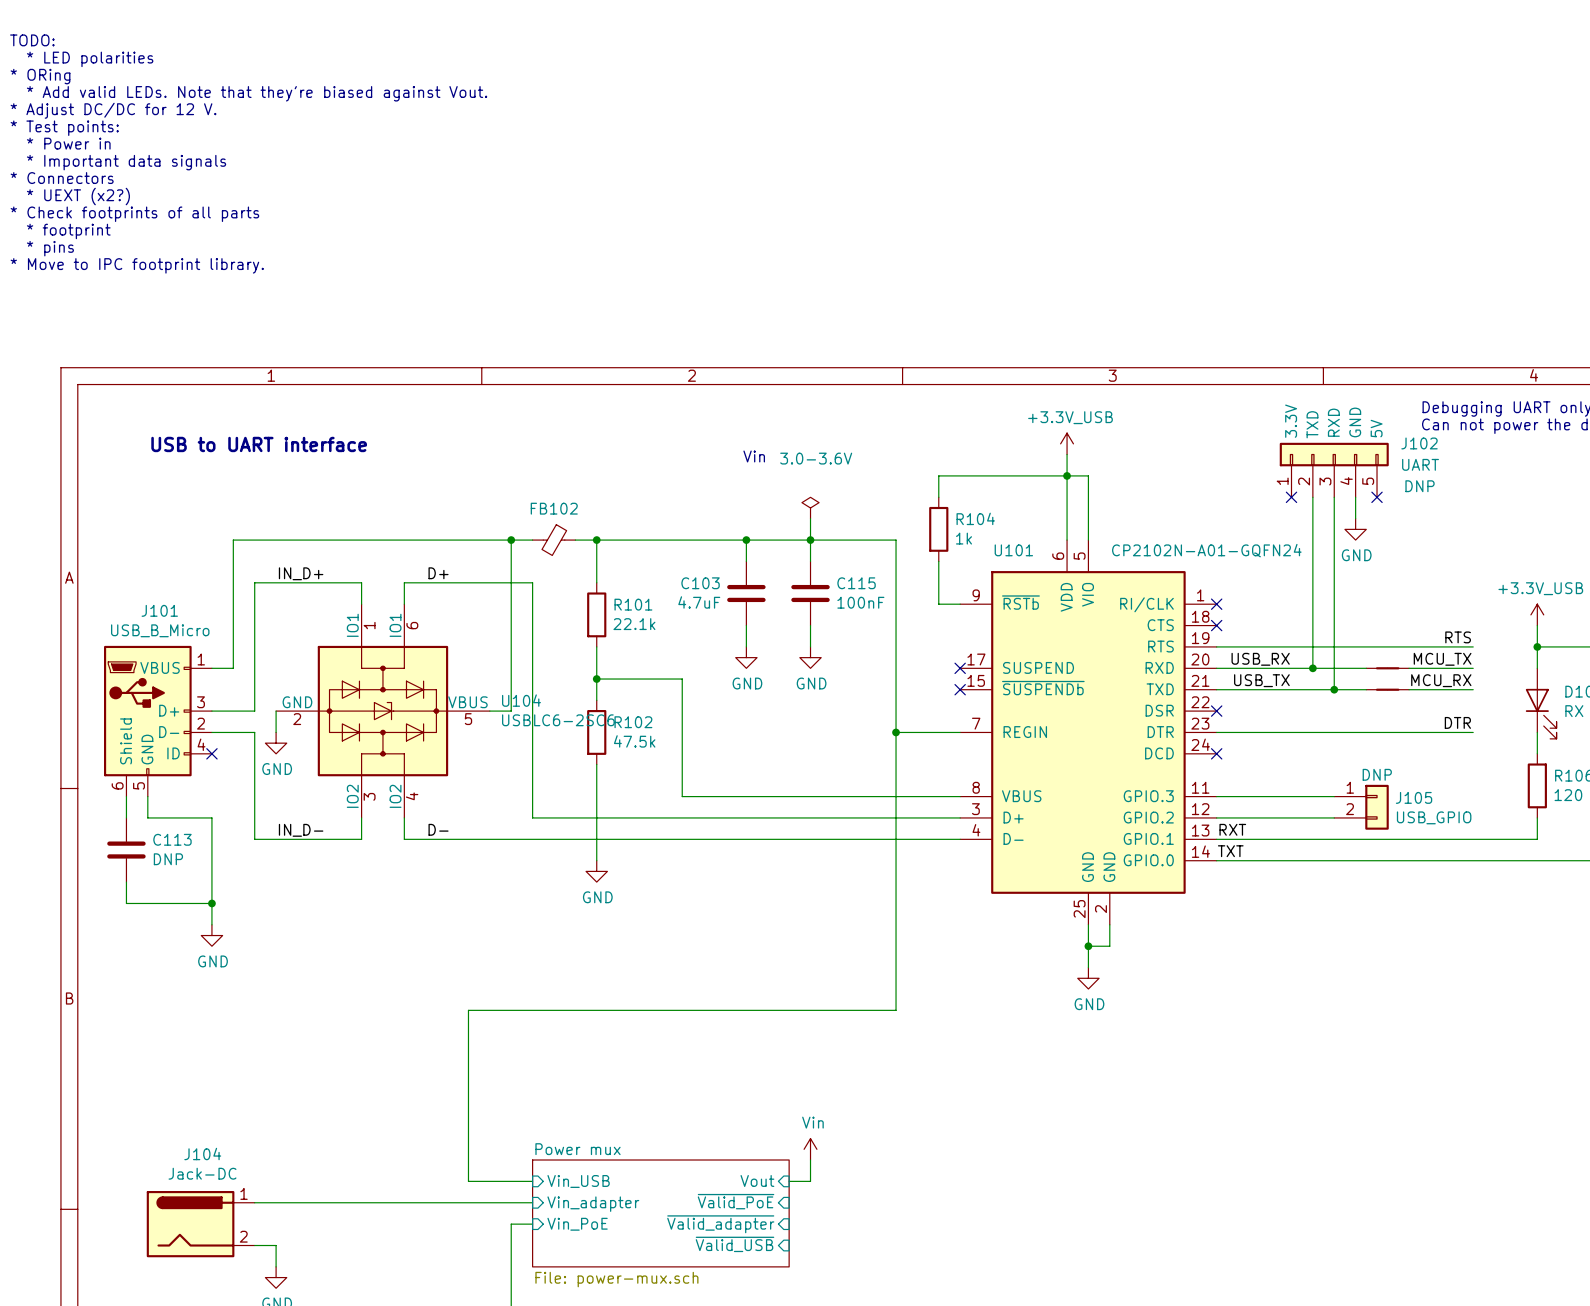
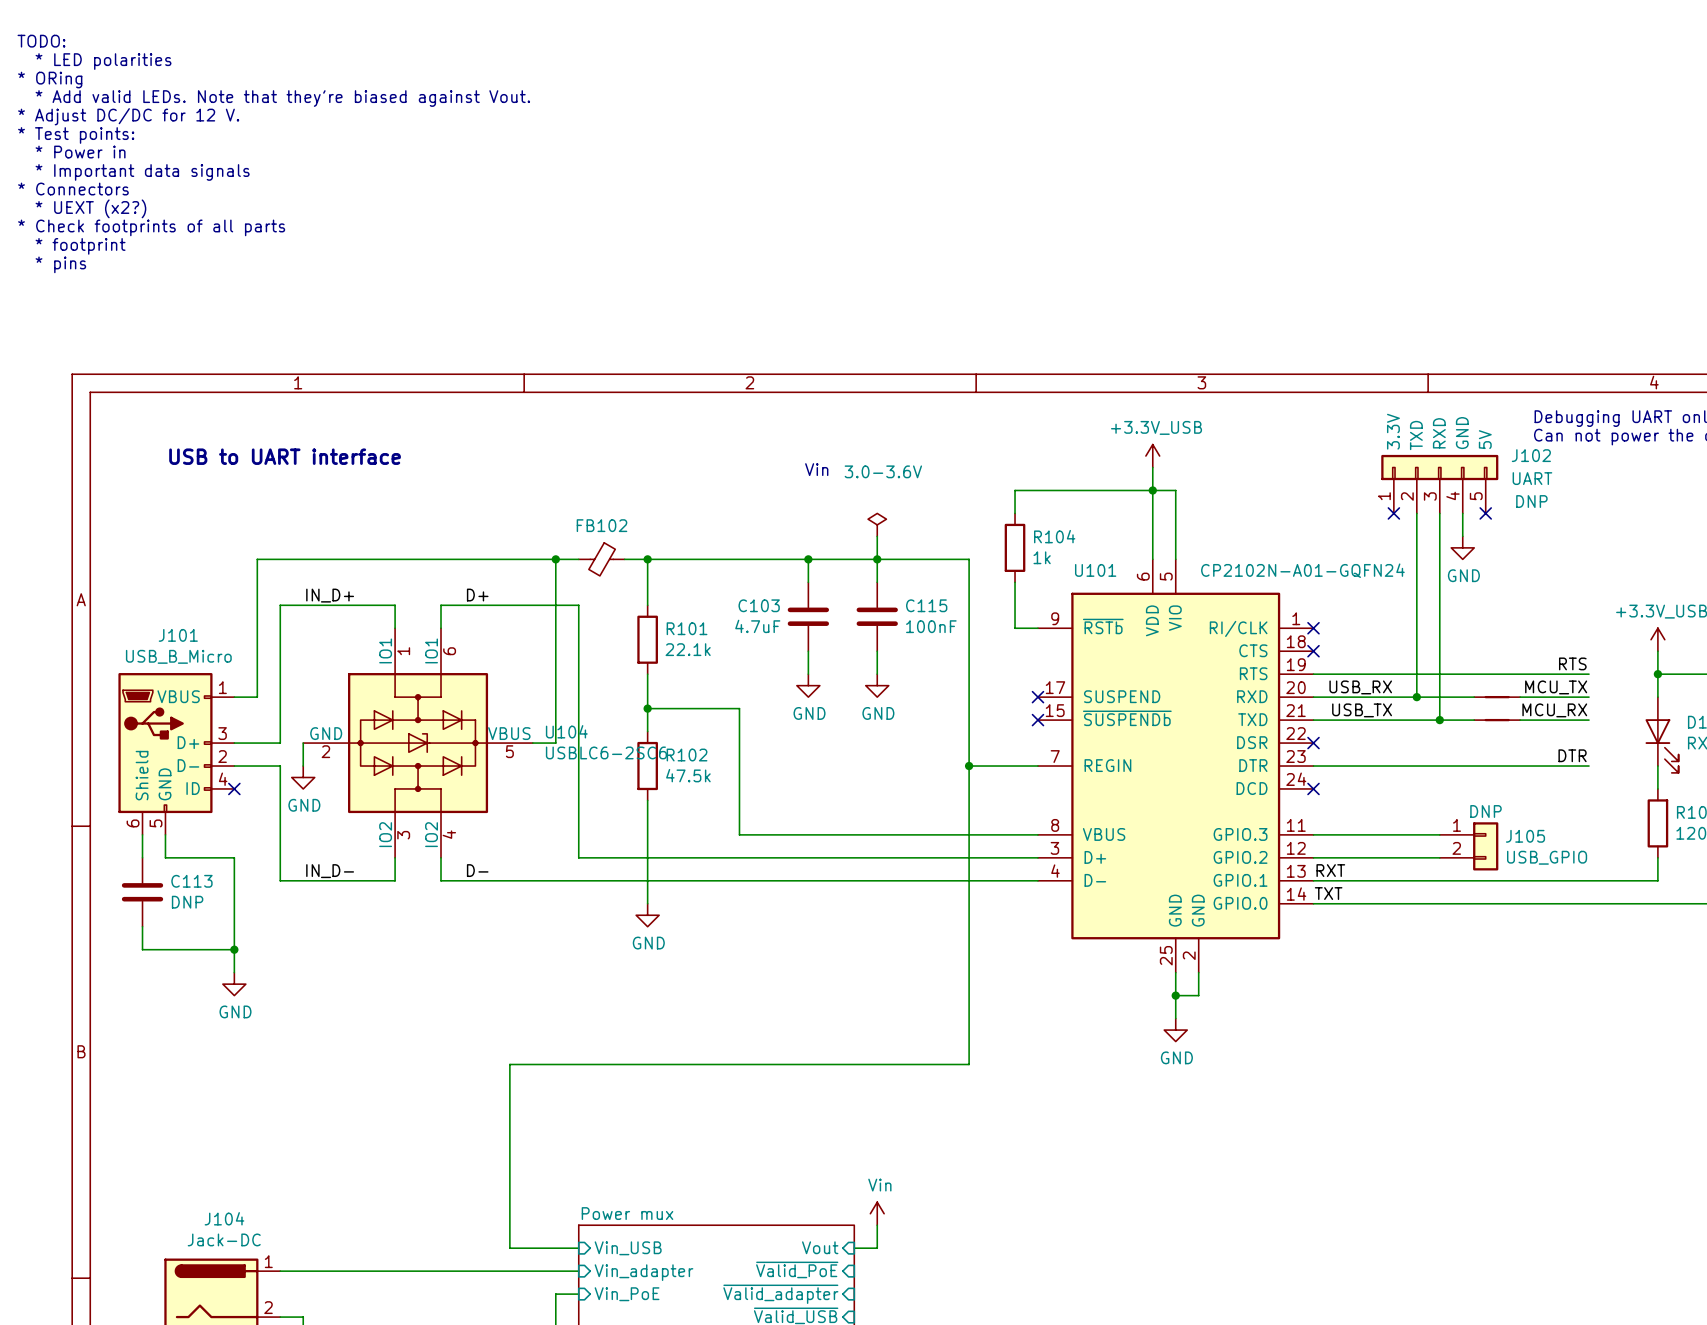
text: TODO: (32, 40) -> none
text: * LED polarities (90, 59) -> TODO: (41, 41)
text: * ORing (40, 76) -> * LED polarities (103, 61)
text: * Add valid LEDs. Note that they're biased against Vout. (257, 93) -> * ORing (50, 80)
text: * Adjust DC/DC for 12 V. (113, 110) -> * Add valid LEDs. Note that they're biased against Vout. (282, 98)
text: * Test points: (64, 128) -> * Adjust DC/DC for 12 V. (128, 116)
text: * Power in (68, 143) -> * Test points: (76, 135)
text: * Important data signals (126, 162) -> * Power in (80, 152)
text: * Connectors (62, 178) -> * Important data signals (142, 172)
text: * UEXT (x2?) (78, 196) -> * Connectors (73, 189)
text: * Check footprints of all parts (134, 214) -> * UEXT (x2?) (90, 208)
text: * footprint (68, 231) -> * Check footprints of all parts (151, 227)
text: * pins (50, 248) -> * footprint (80, 246)
text: * Move to IPC footprint library. (137, 265) -> * pins (60, 264)

